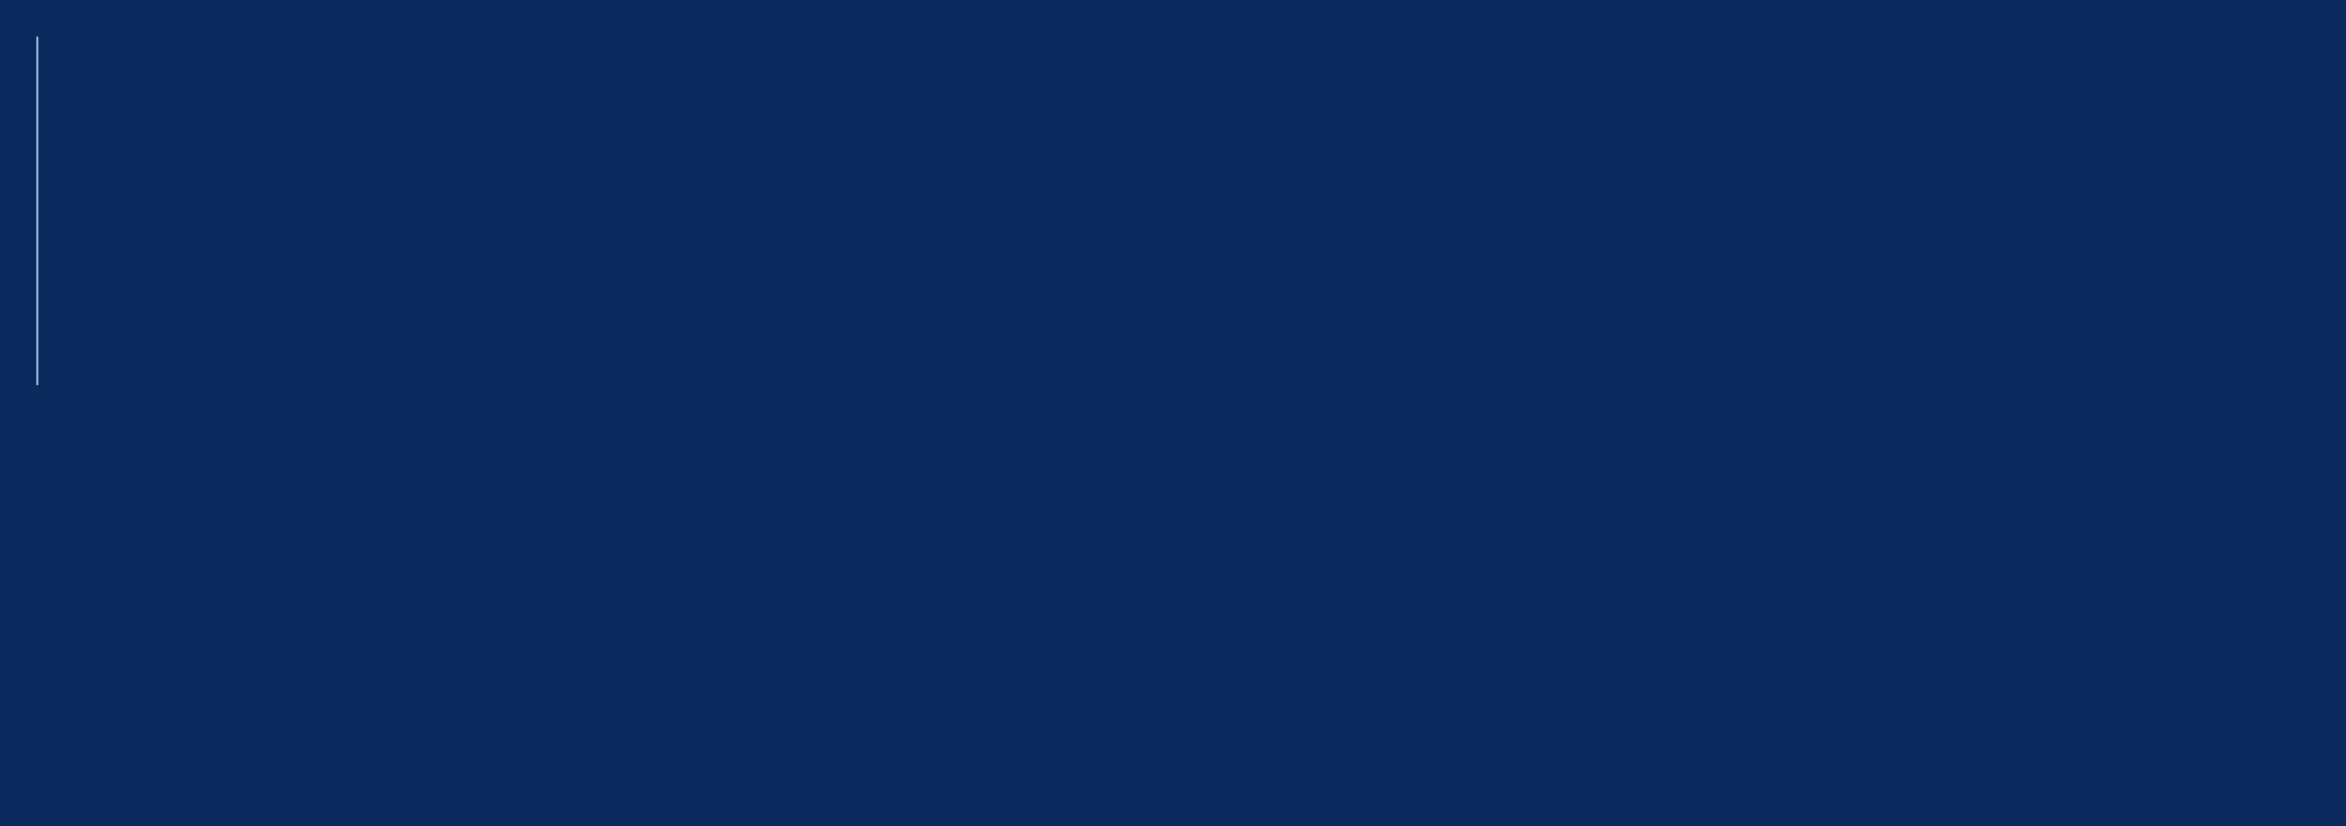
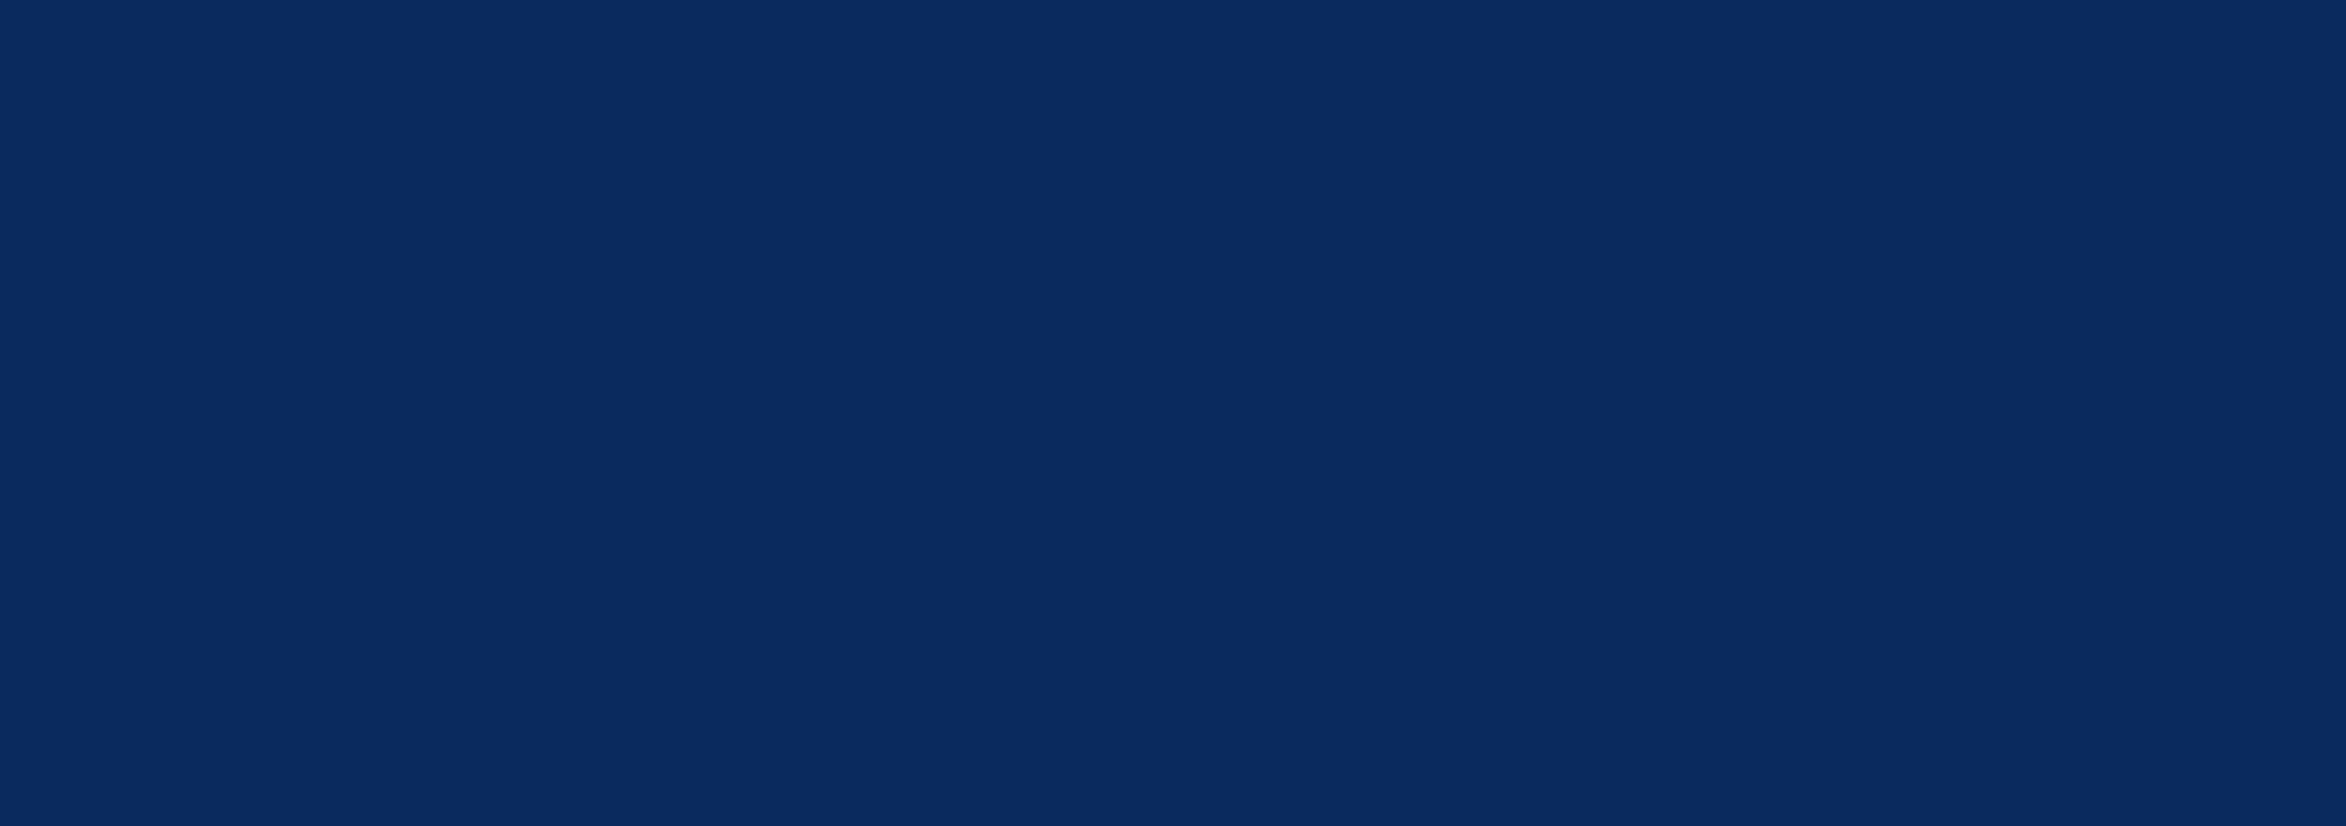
line: (37, 37) (37, 384) -> none

